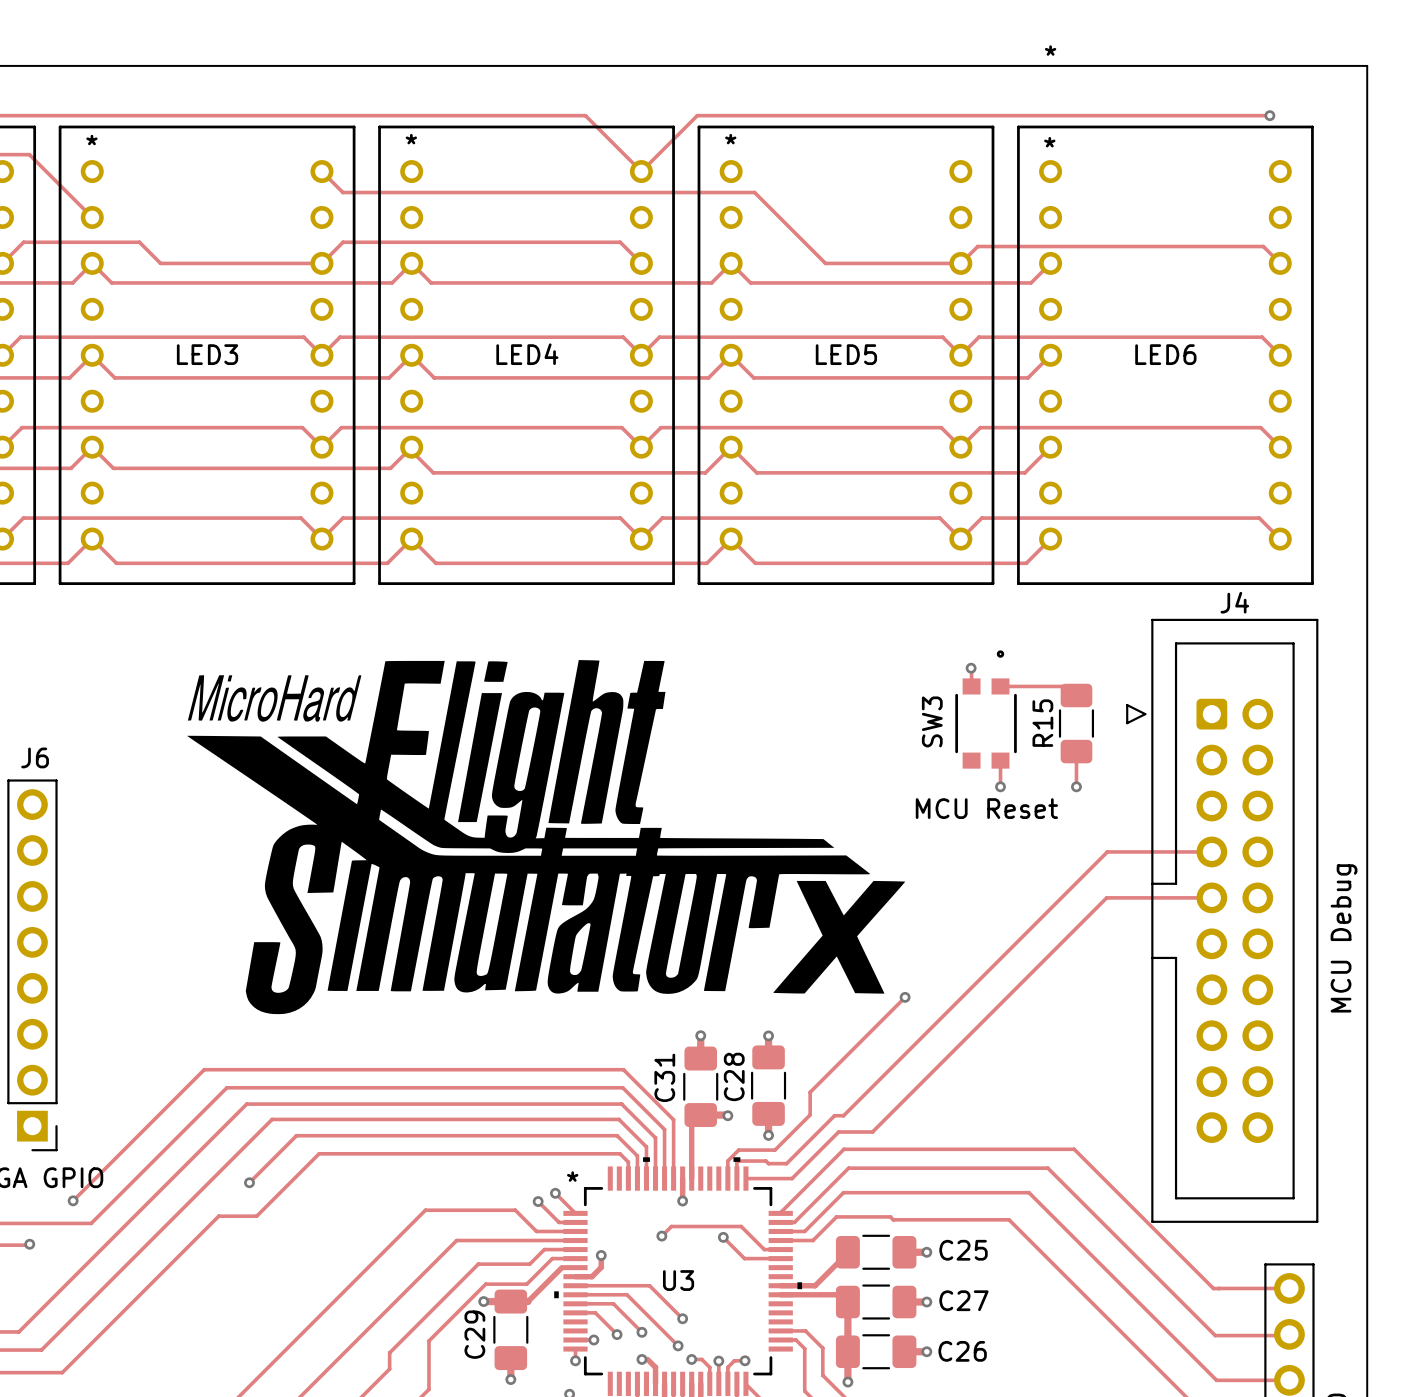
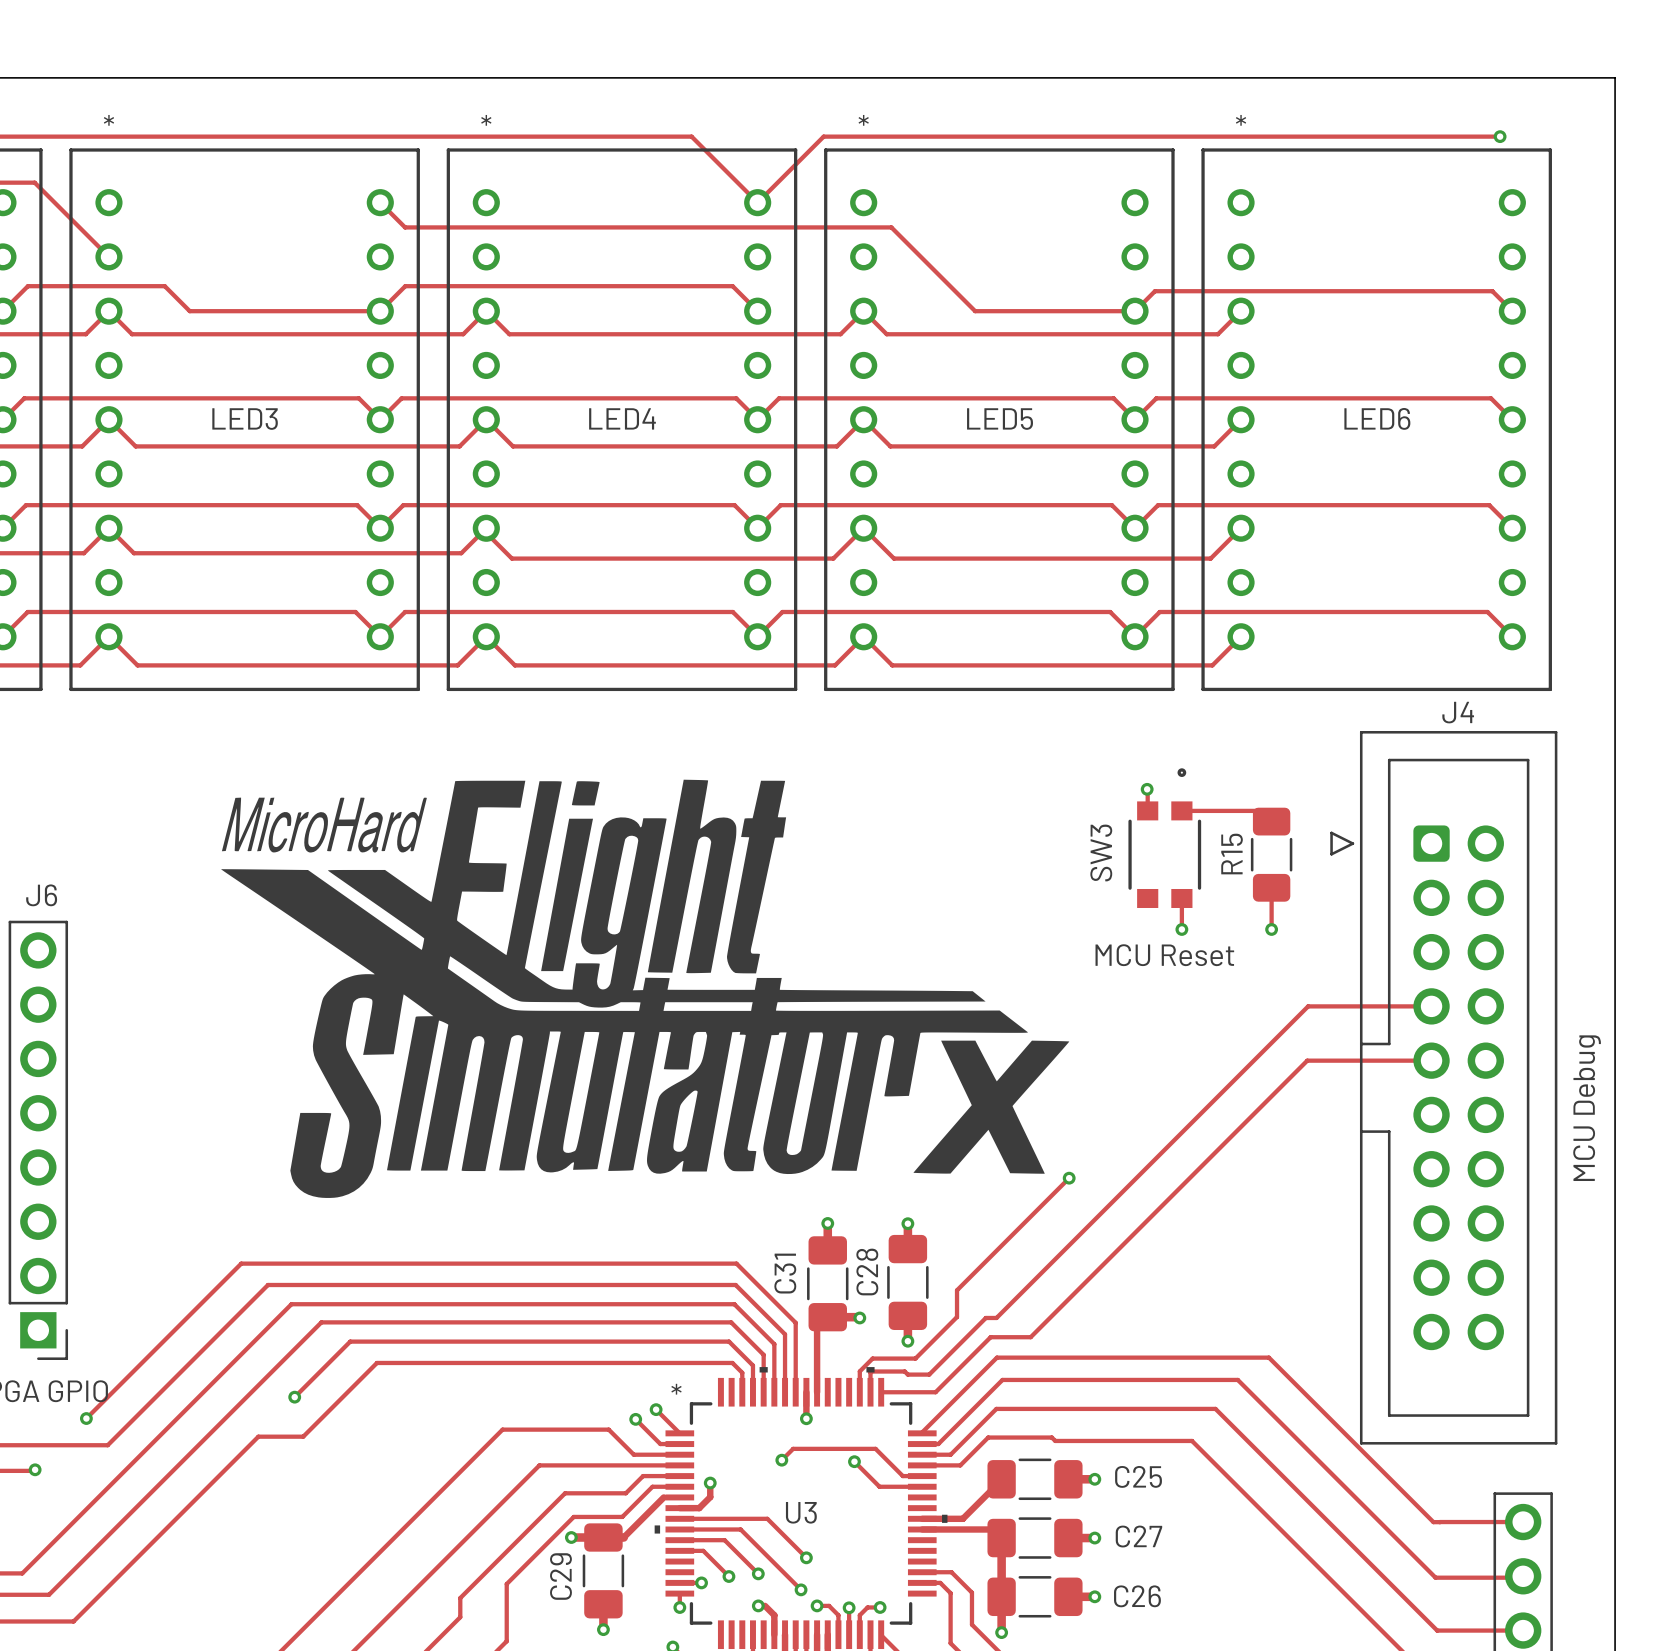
LED6 text: * (1050, 50) -> none
LED4 text position: * (411, 139) -> * (486, 120)
LED5 text position: * (730, 139) -> * (863, 120)
LED3 text position: * (91, 140) -> * (108, 120)
LED6 text position: * (1049, 142) -> * (1241, 120)

